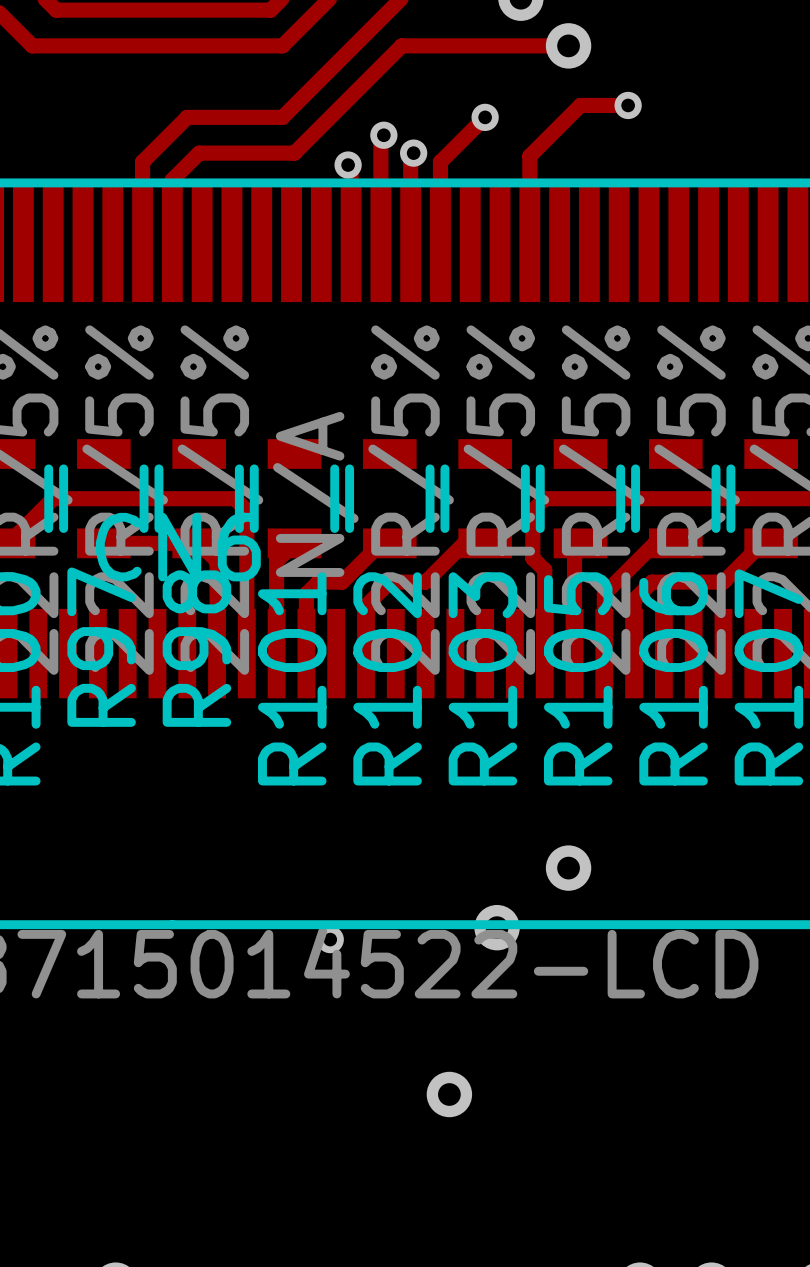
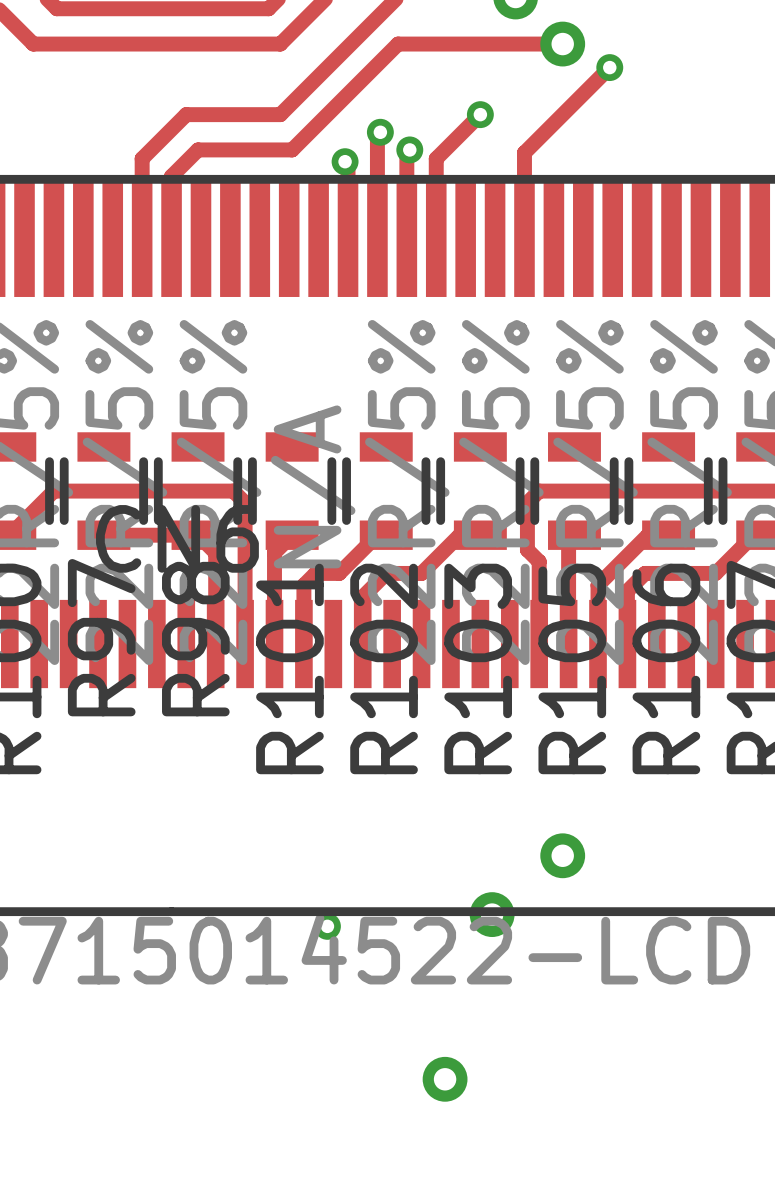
track: (580, 105) (628, 105) -> (574, 102) (609, 67)
via position: (628, 105) -> (609, 67)

